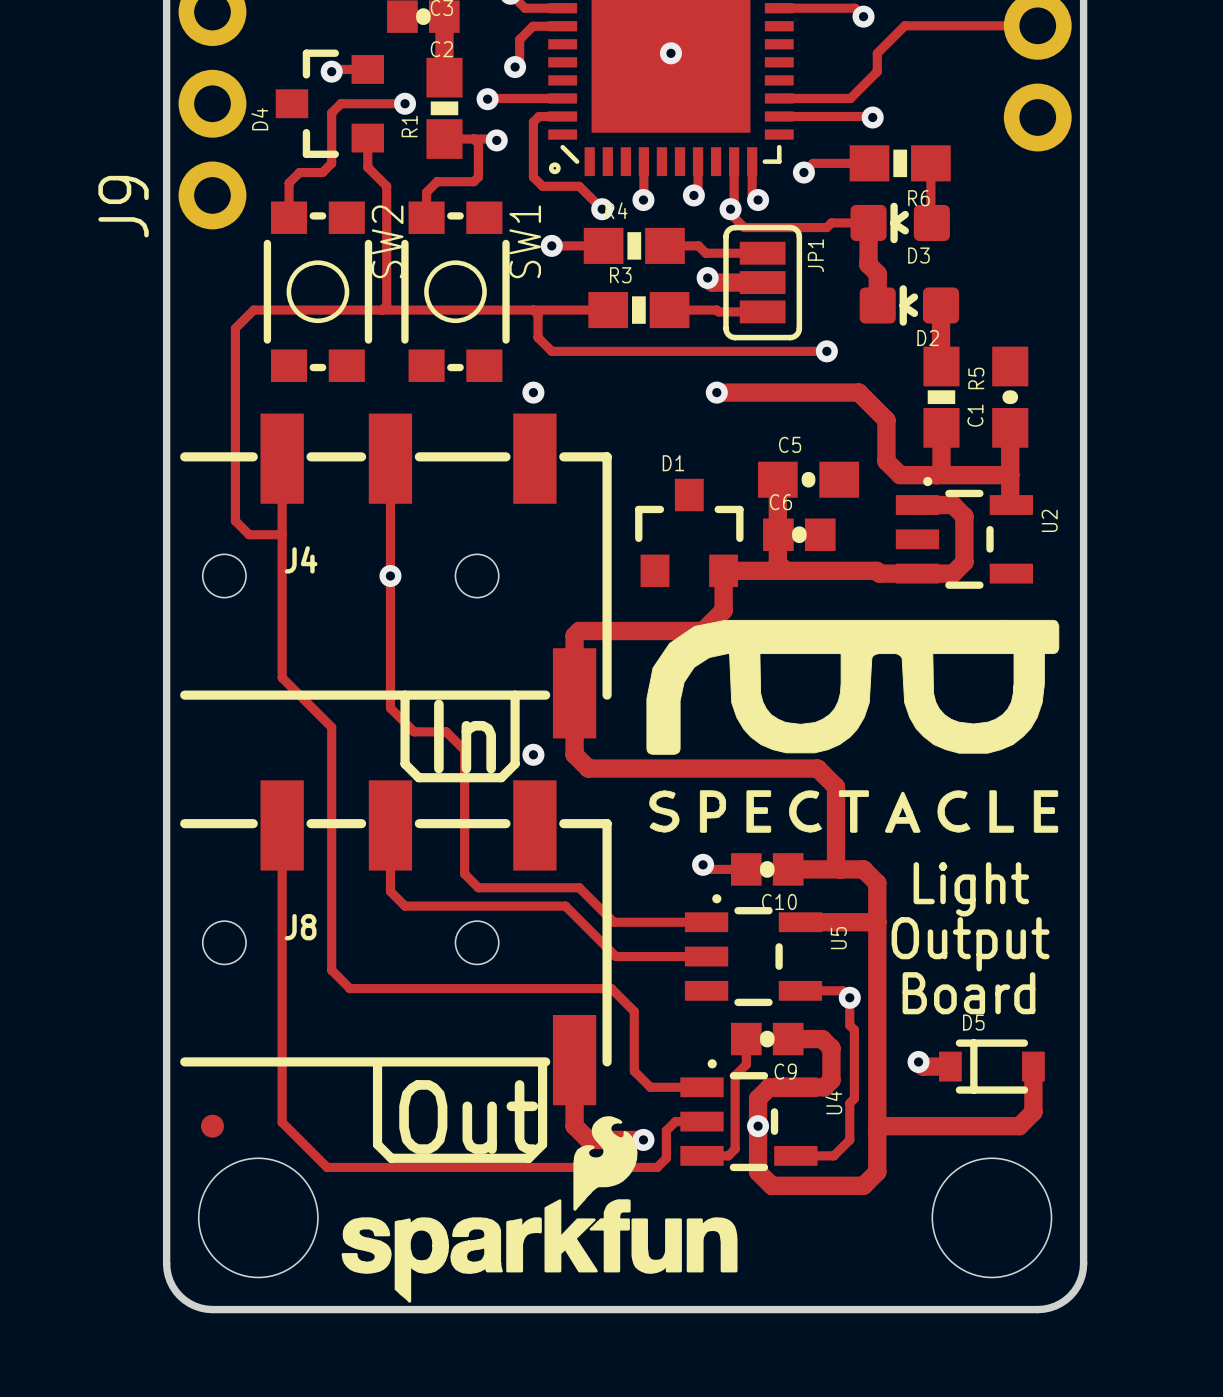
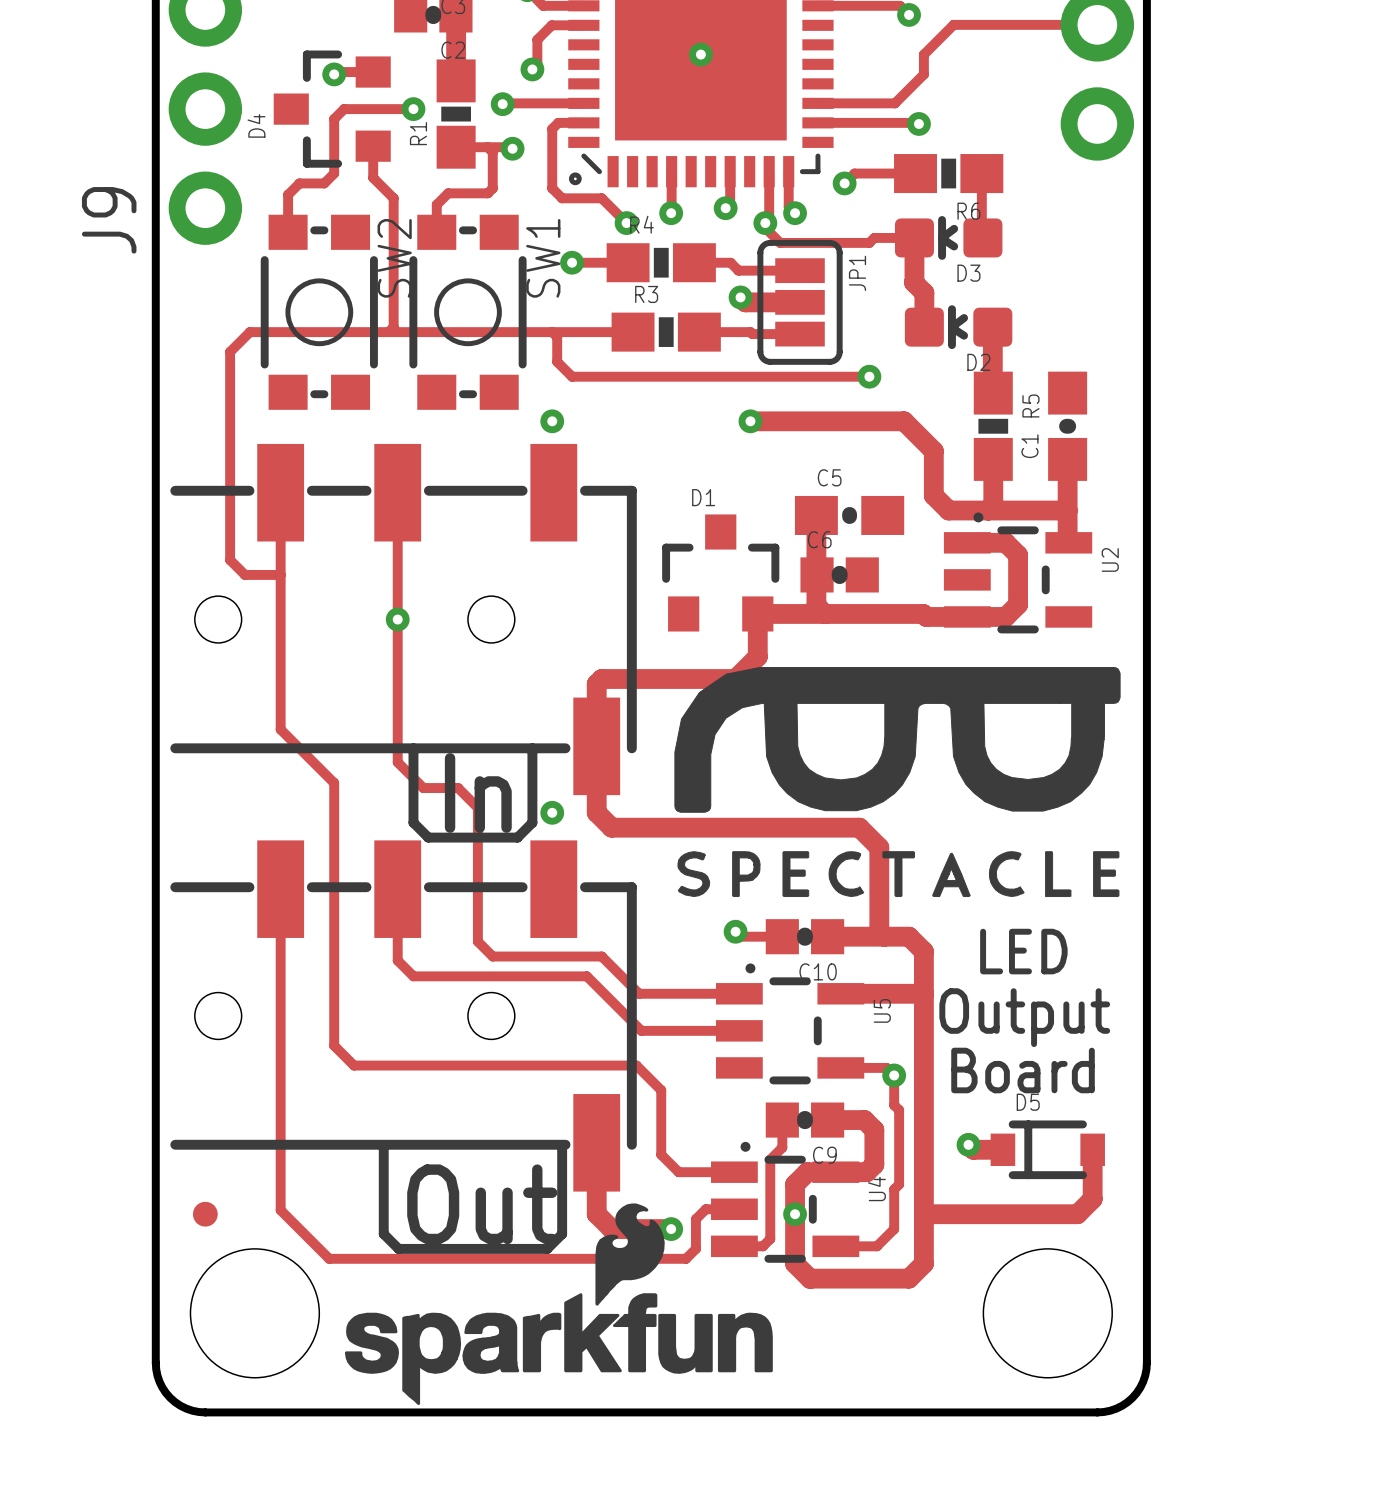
J4 name: J4 (301, 559) -> none
text: Light (971, 889) -> LED (1023, 951)
J8 name: J8 (300, 927) -> none

